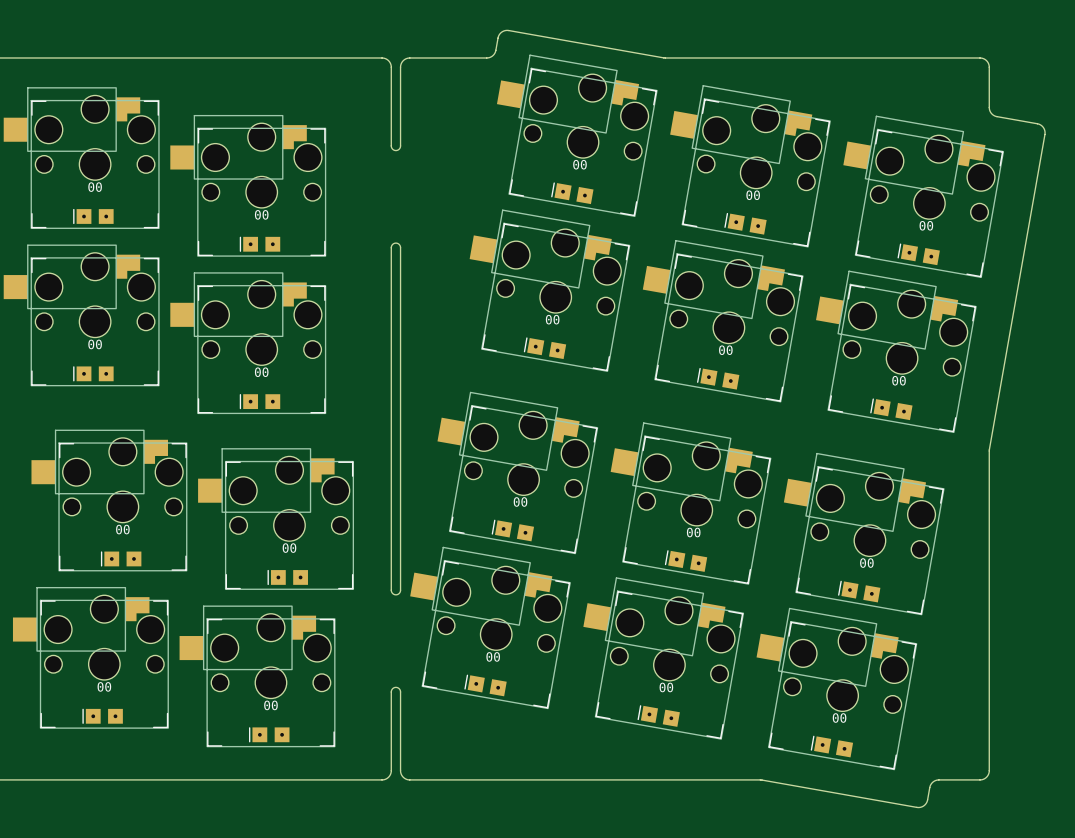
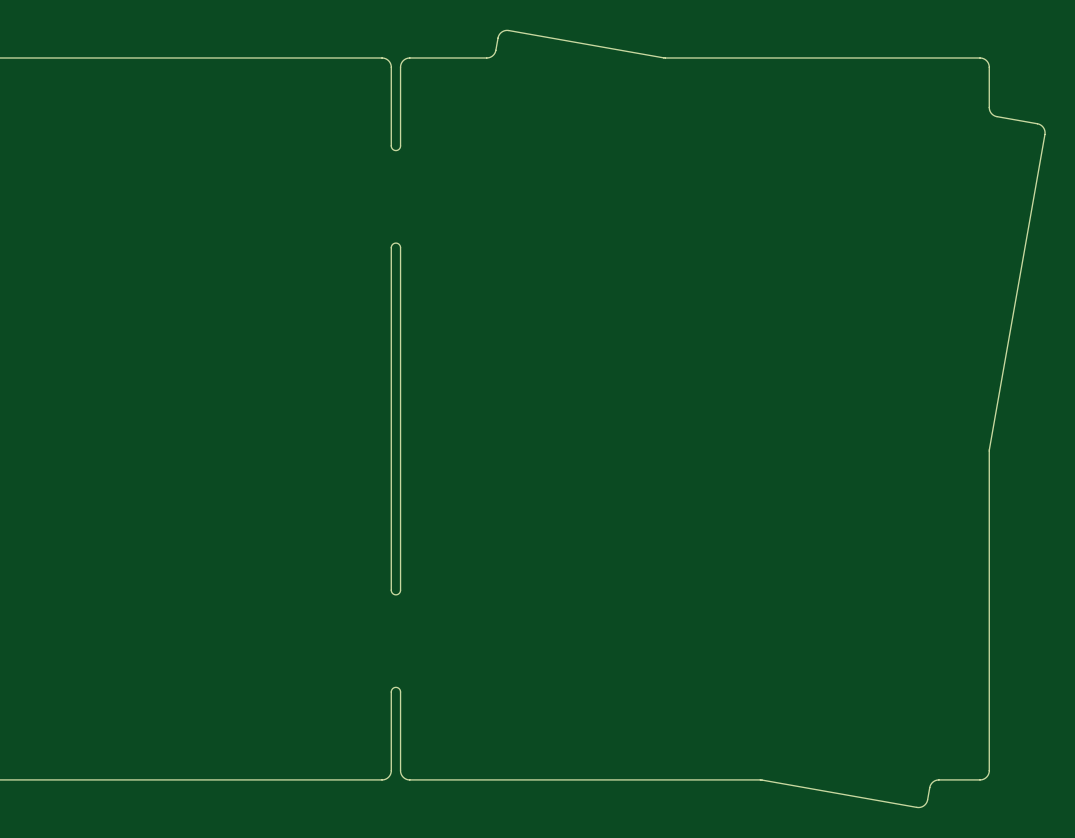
part: (576, 135) -> none
part: (81, 158) -> none
part: (750, 166) -> none
part: (247, 185) -> none
part: (923, 196) -> none
part: (549, 290) -> none
part: (81, 315) -> none
part: (722, 321) -> none
part: (247, 343) -> none
part: (896, 351) -> none
part: (517, 473) -> none
part: (109, 500) -> none
part: (690, 503) -> none
part: (275, 519) -> none
part: (863, 534) -> none
part: (490, 627) -> none
part: (90, 657) -> none
part: (663, 658) -> none
part: (257, 676) -> none
part: (836, 689) -> none

